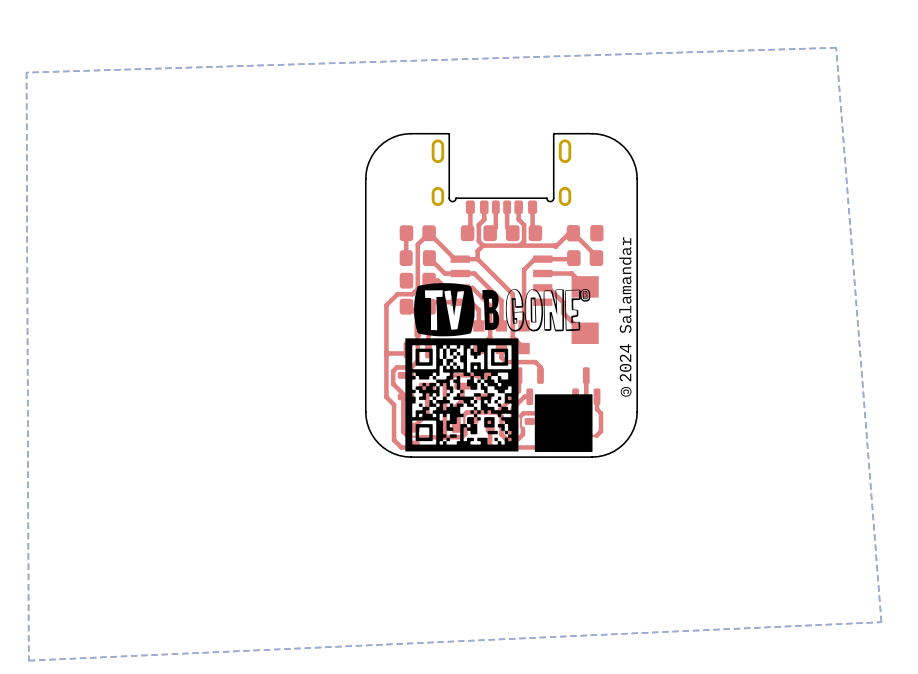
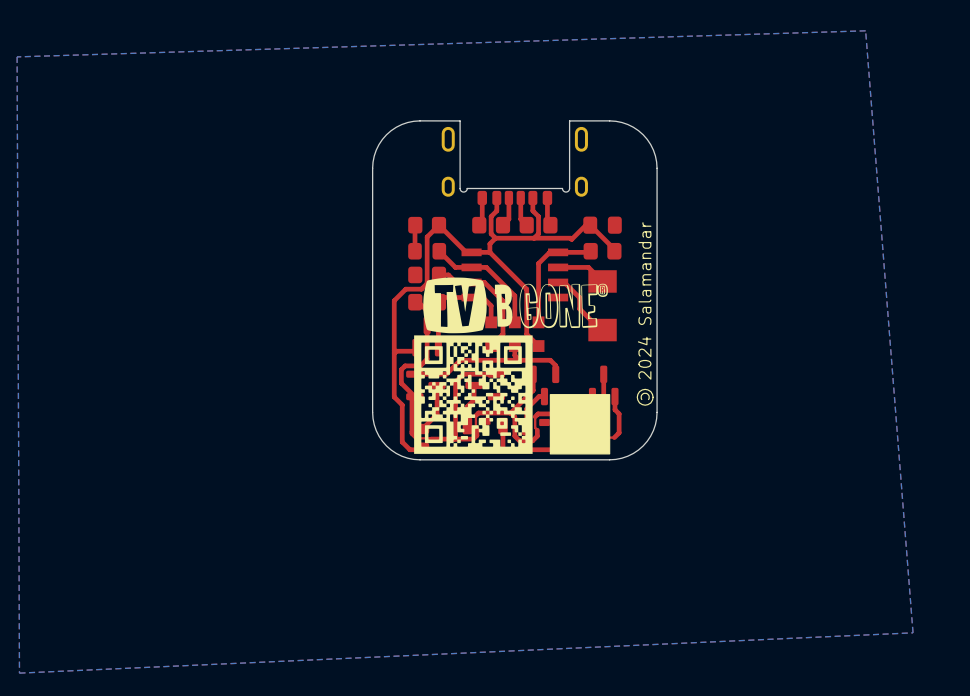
top track: none -> (519, 360) (460, 360) (446, 374) (414, 374)

